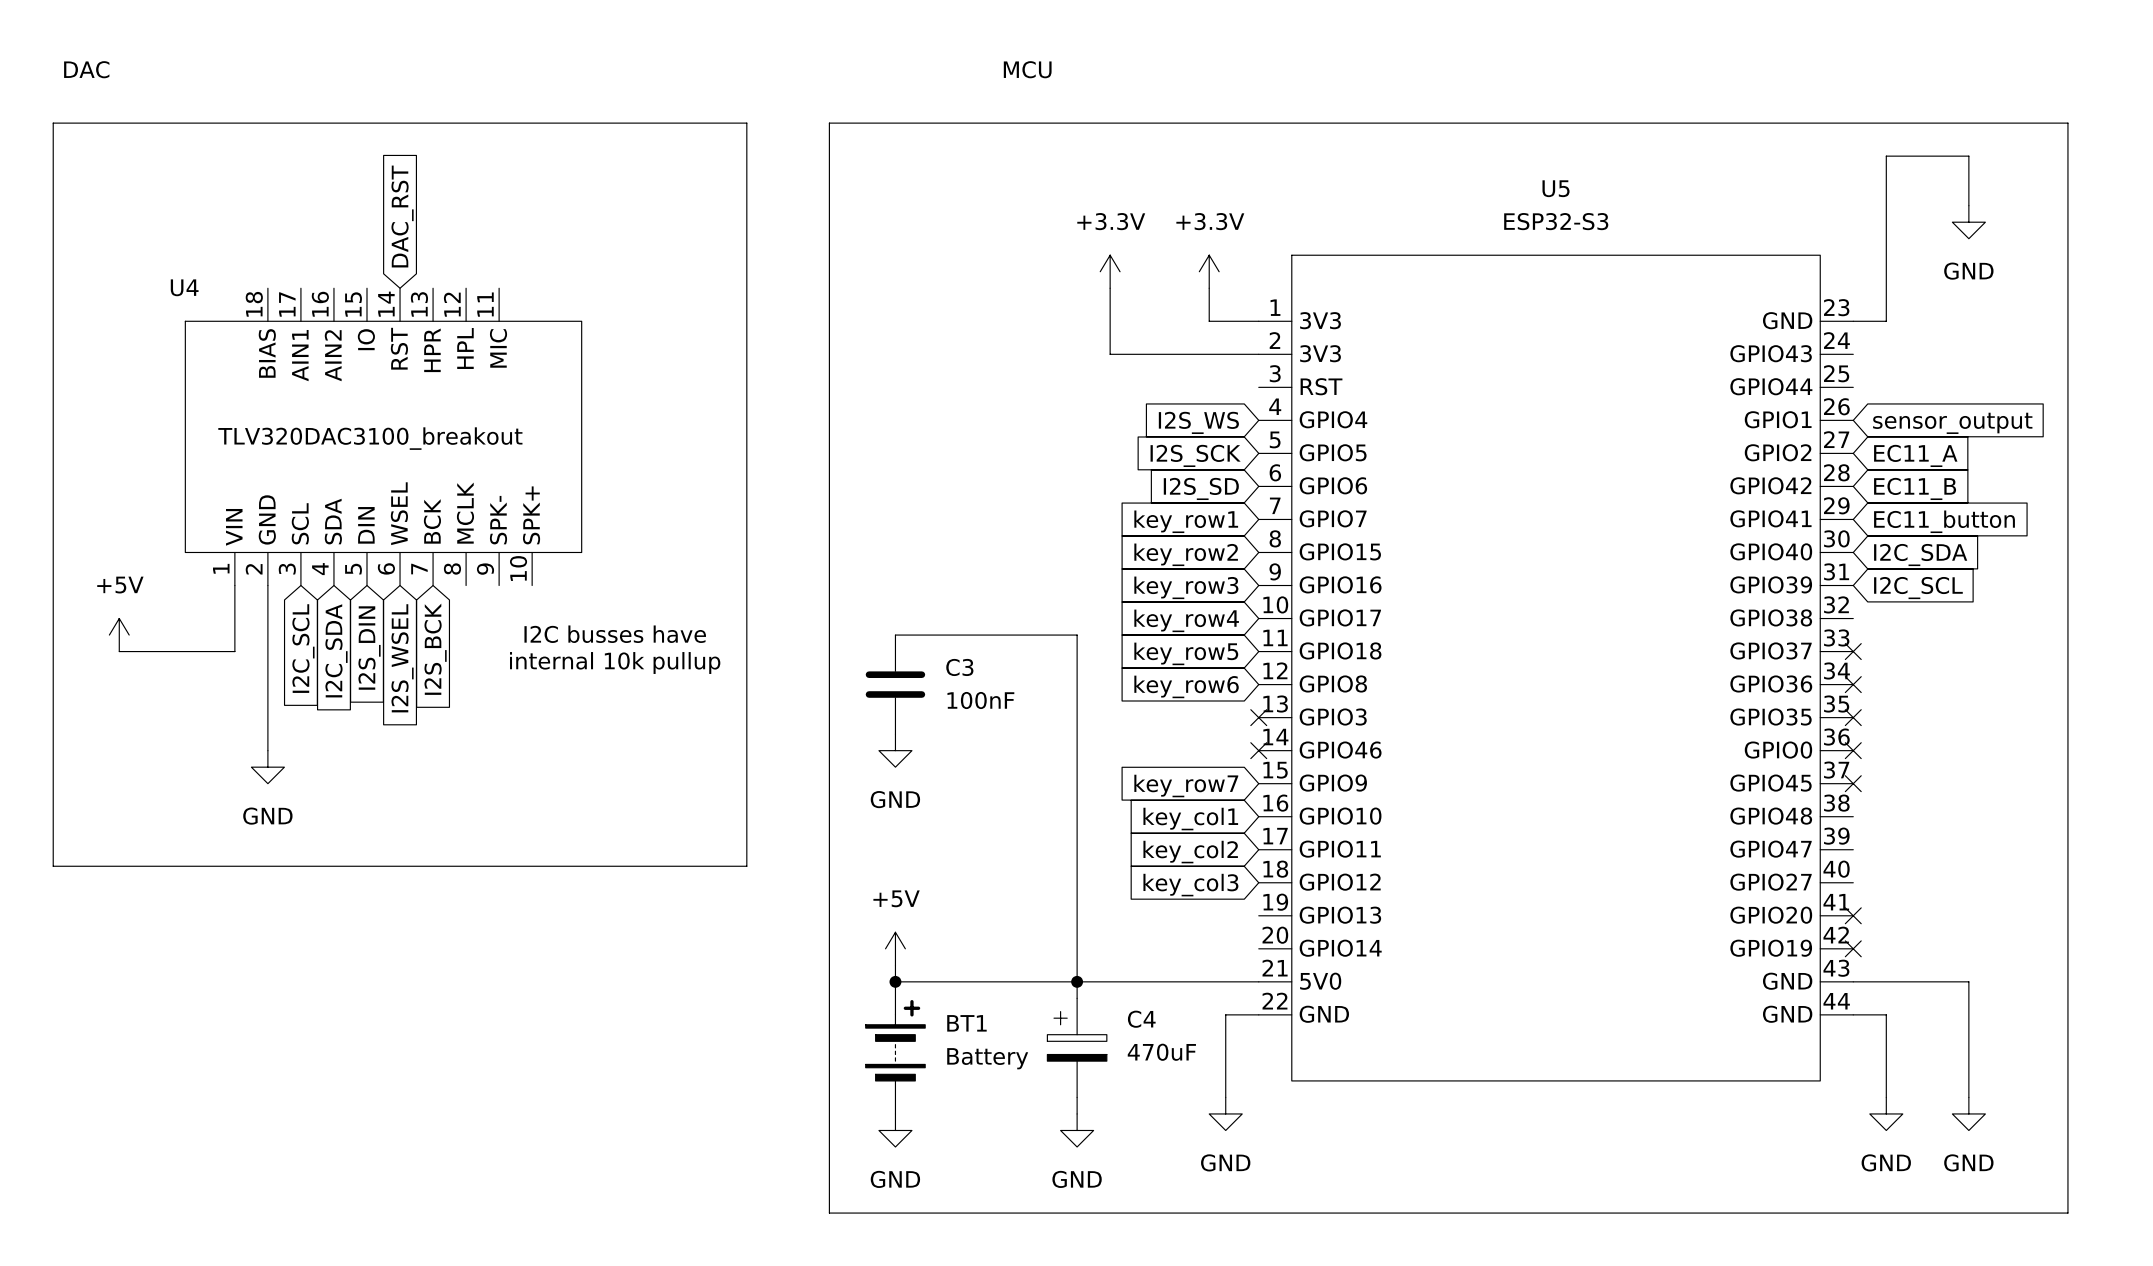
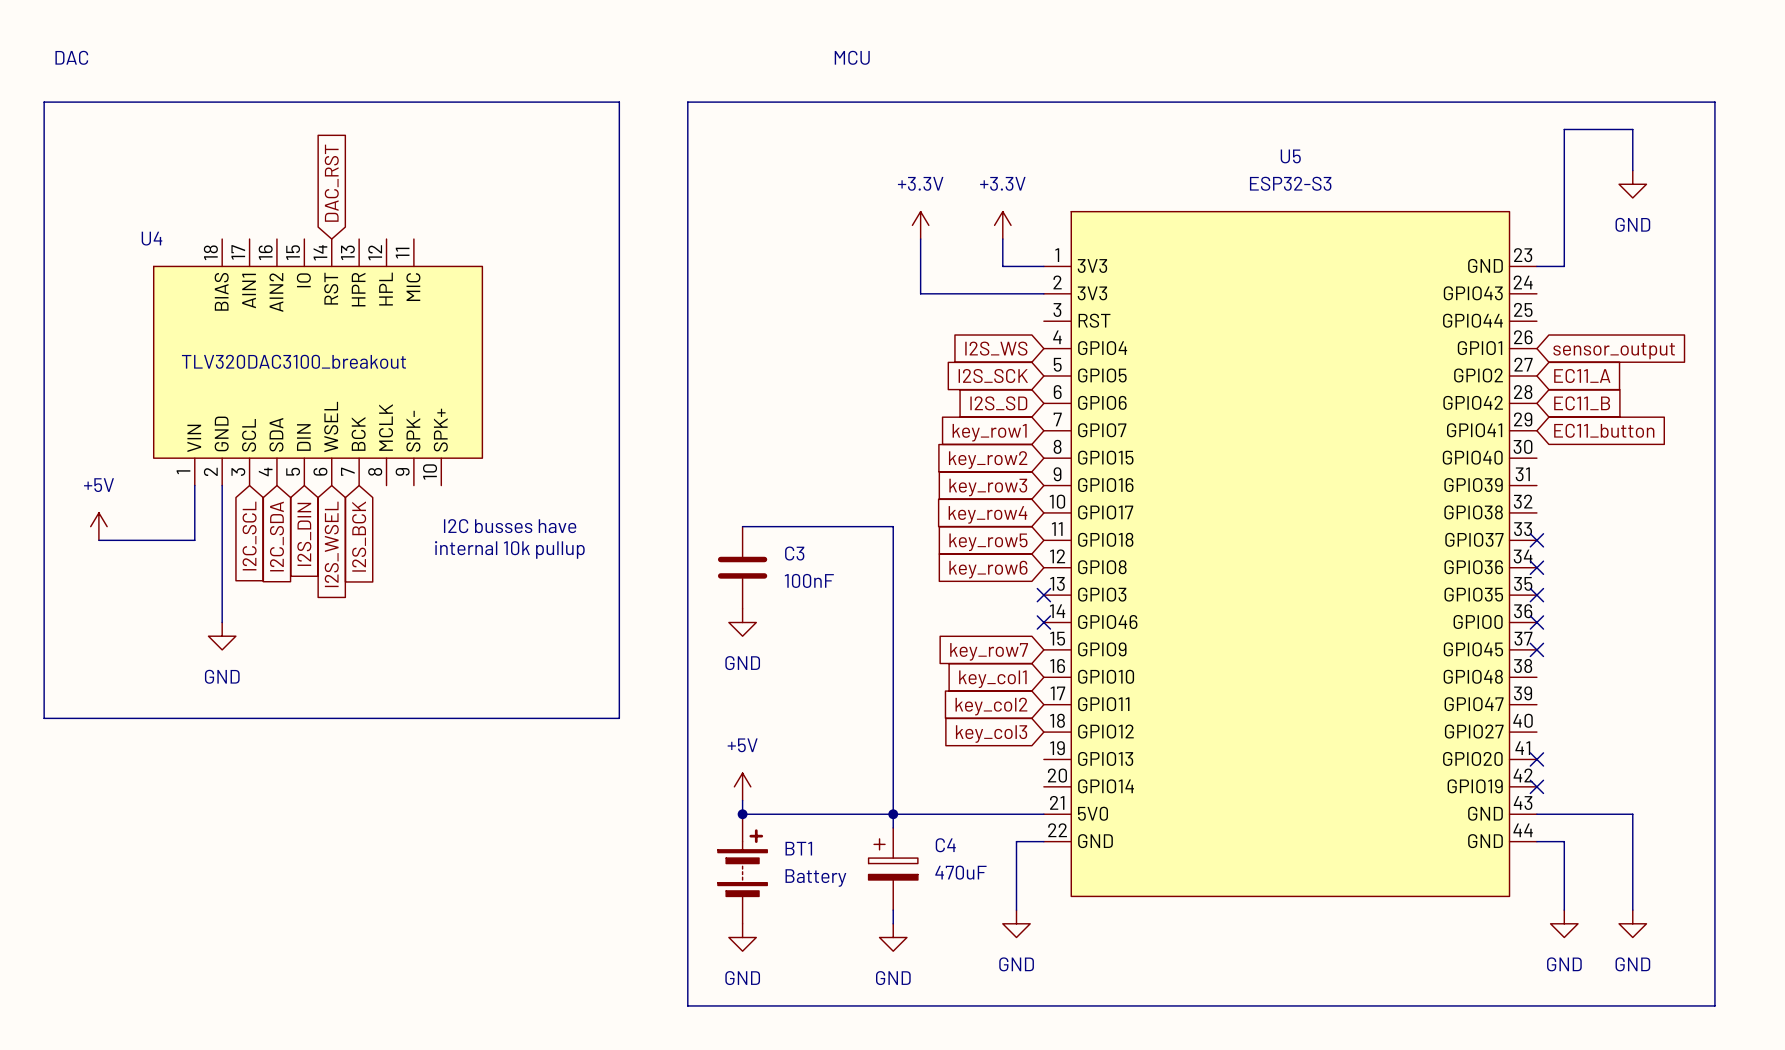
global label: I2C_SDA (1920, 555) -> none
global label: I2C_SCL (1918, 588) -> none

